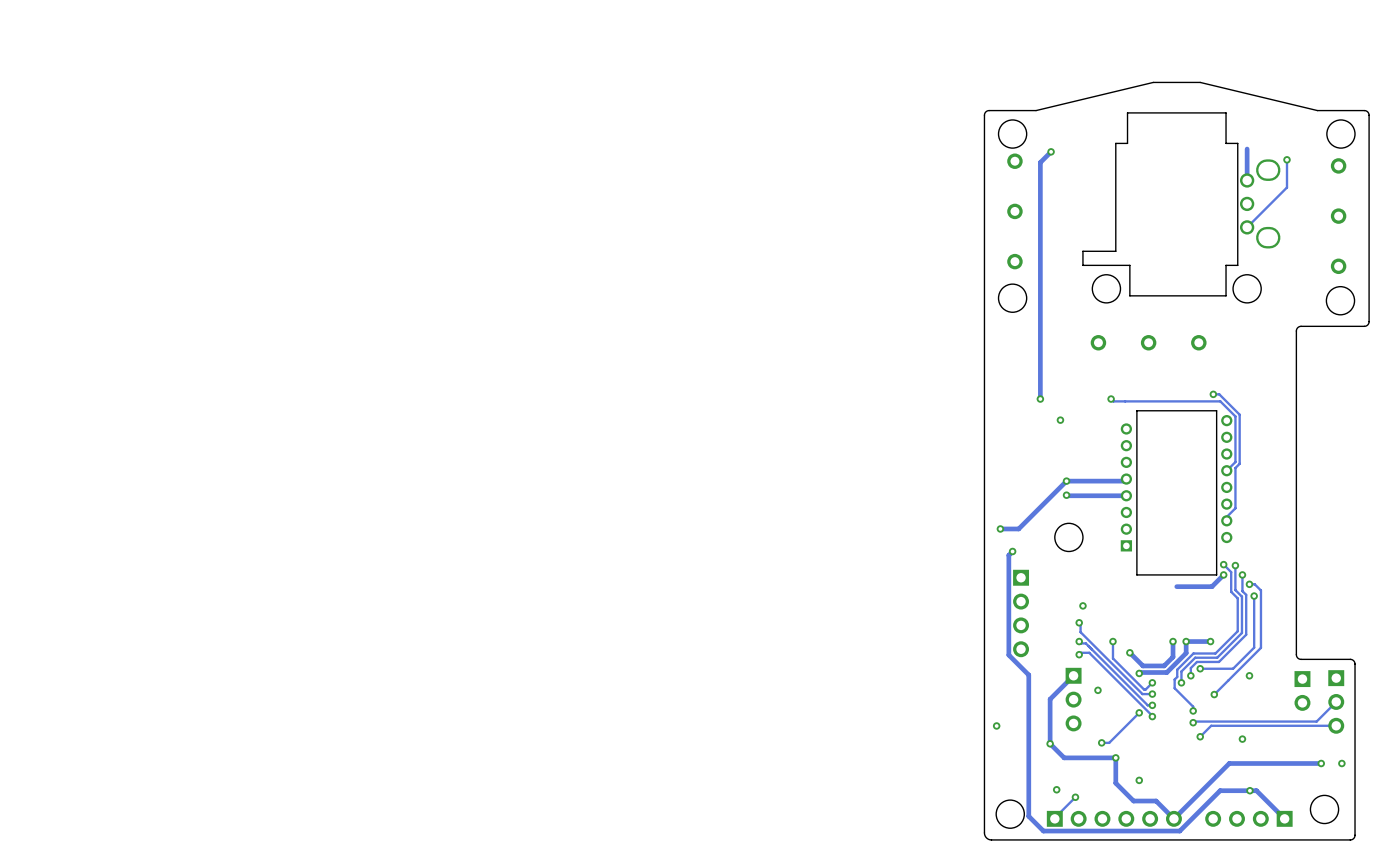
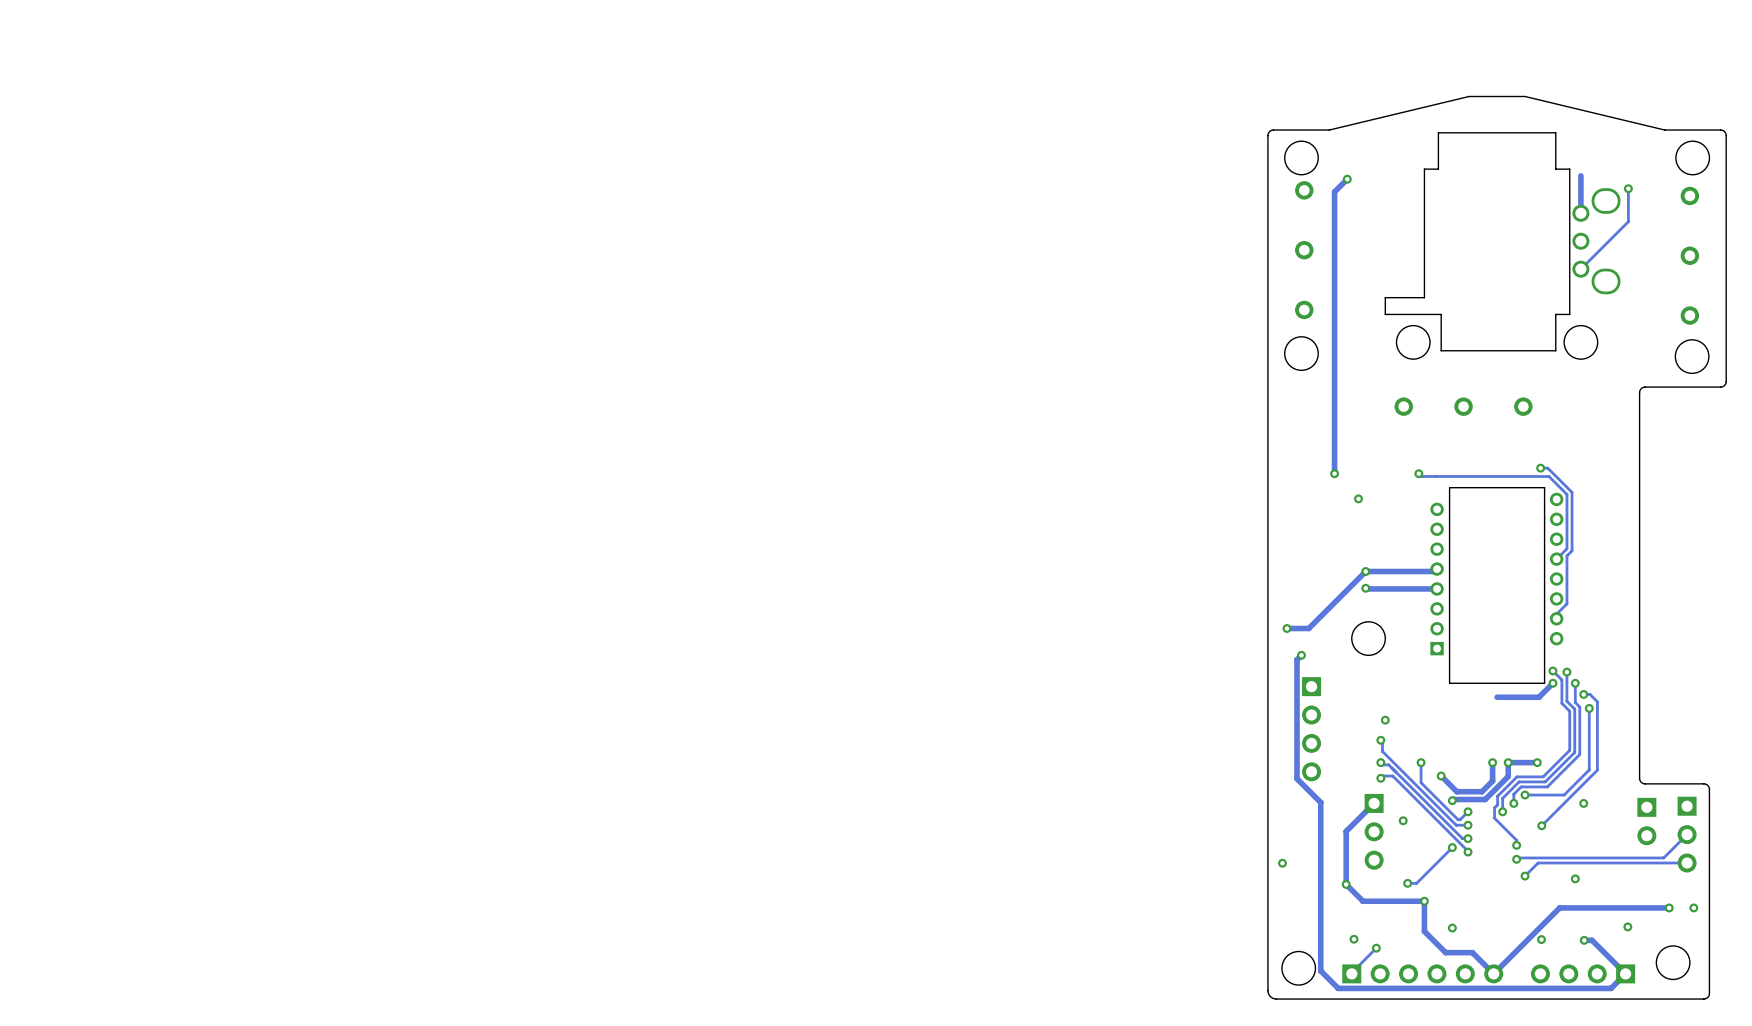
via: none -> (1627, 926)
via: none -> (1541, 939)
track: (1249, 790) (1220, 790) (1179, 831) -> (1625, 973) (1611, 988) (1500, 988)

